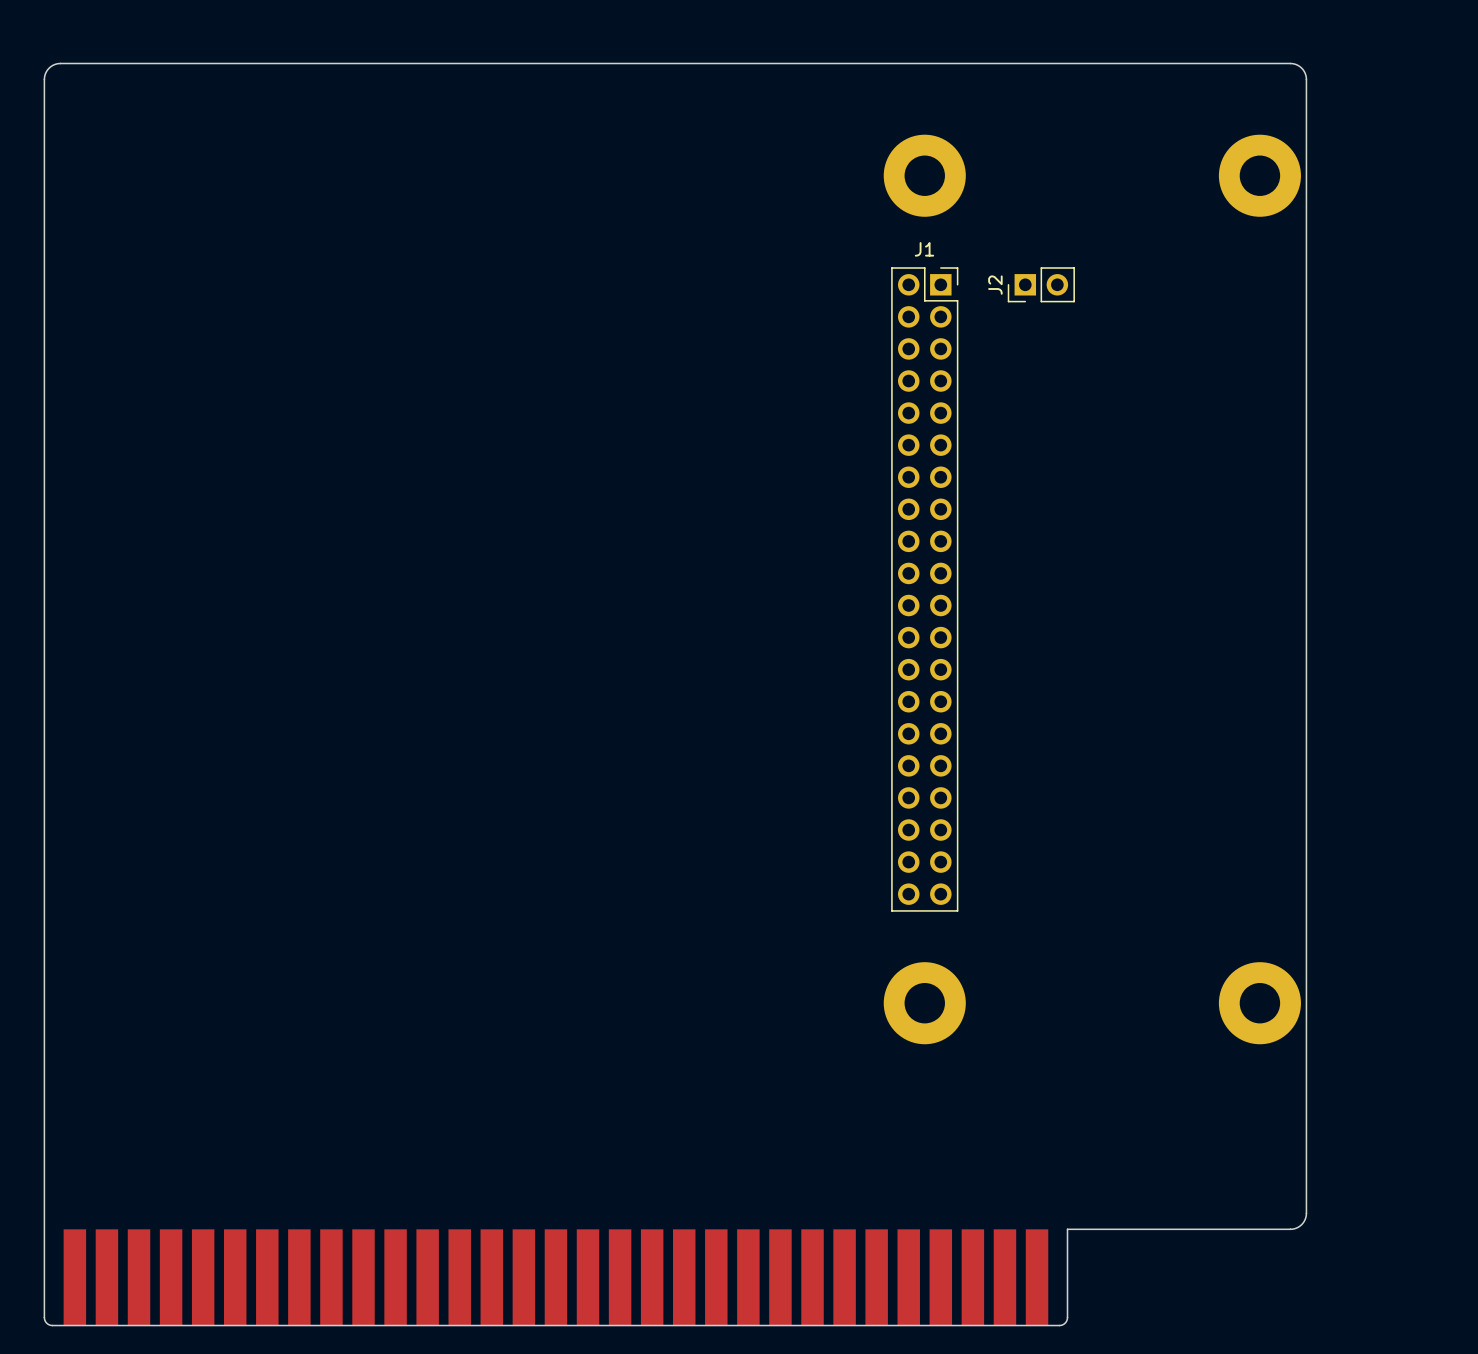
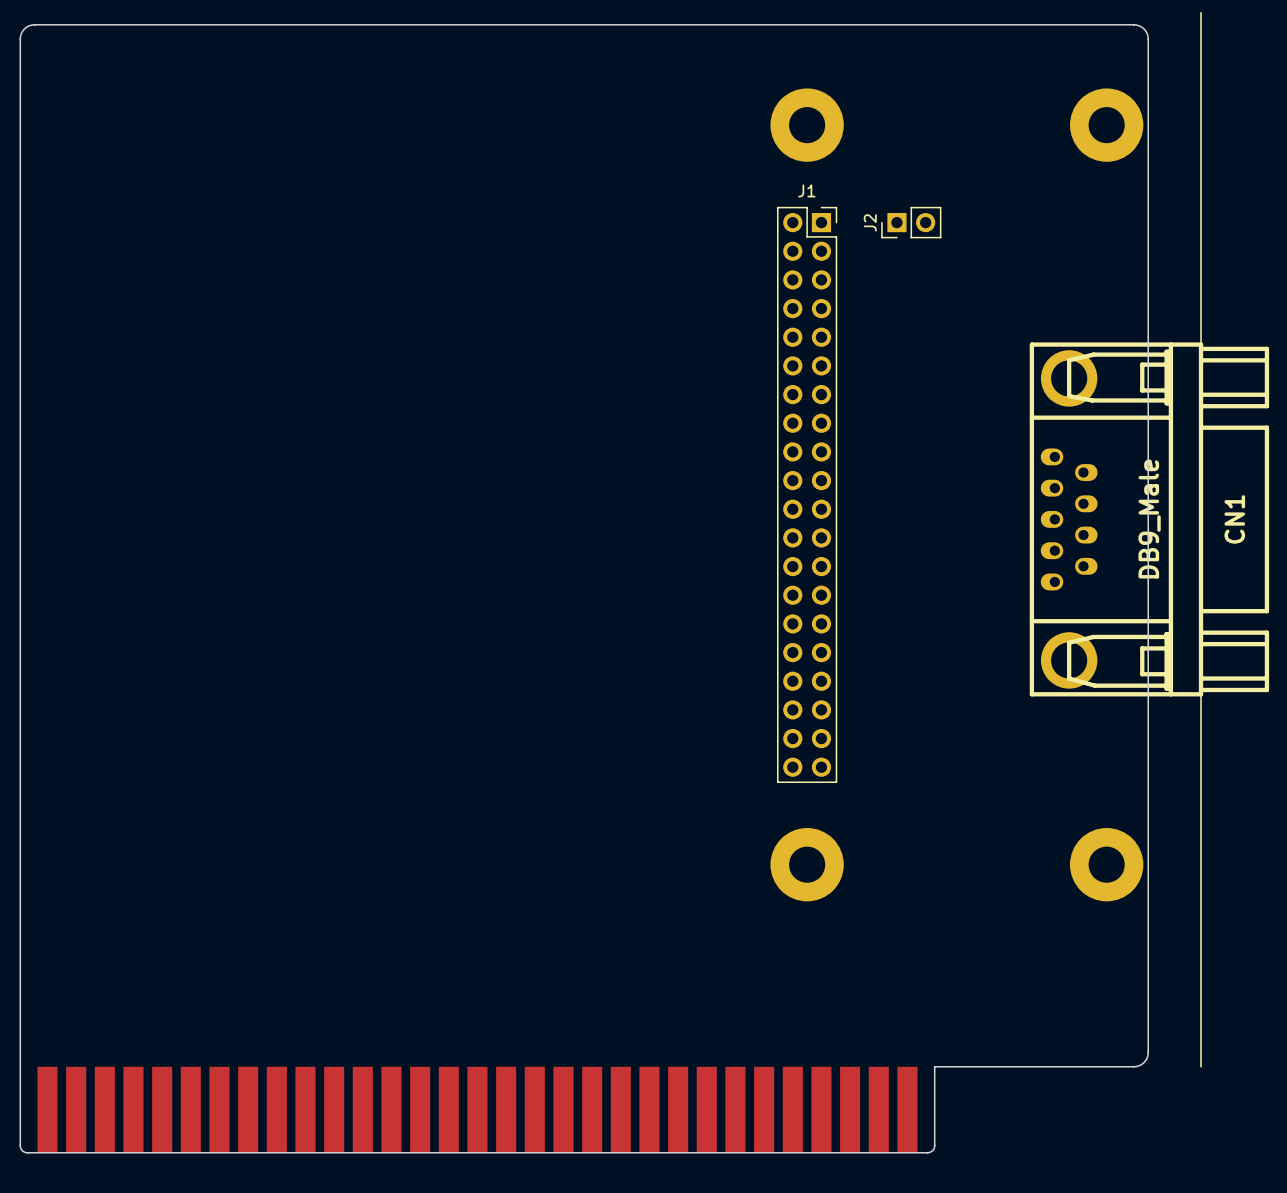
line: none -> (1201, 12) (1201, 1066)
CN1: none -> DB9_Male (1149, 519)

